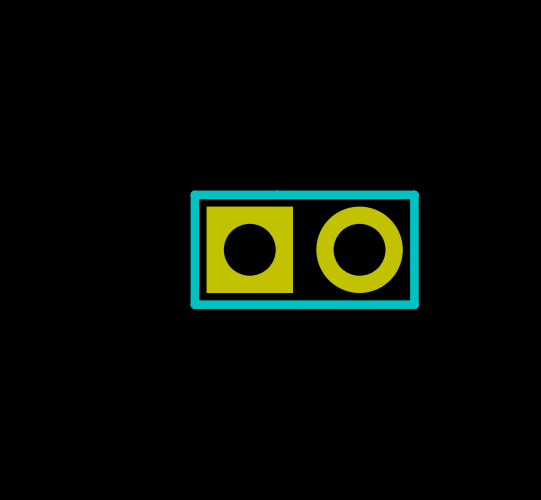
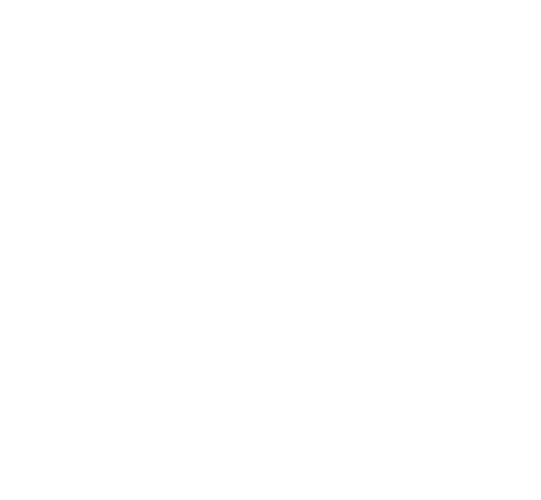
part: (304, 249) -> none

